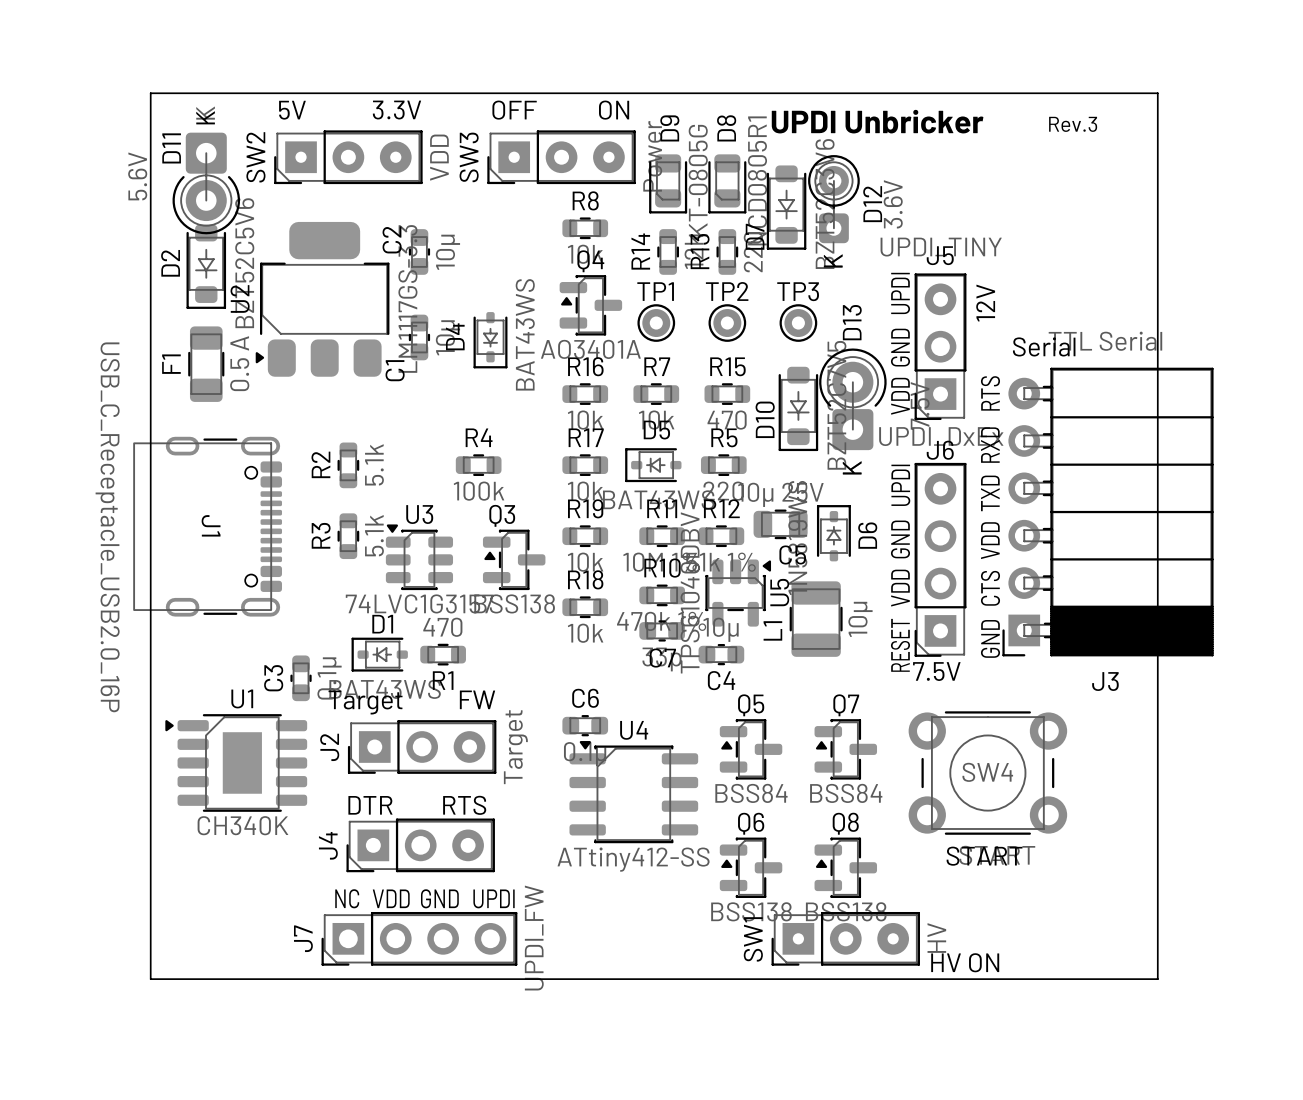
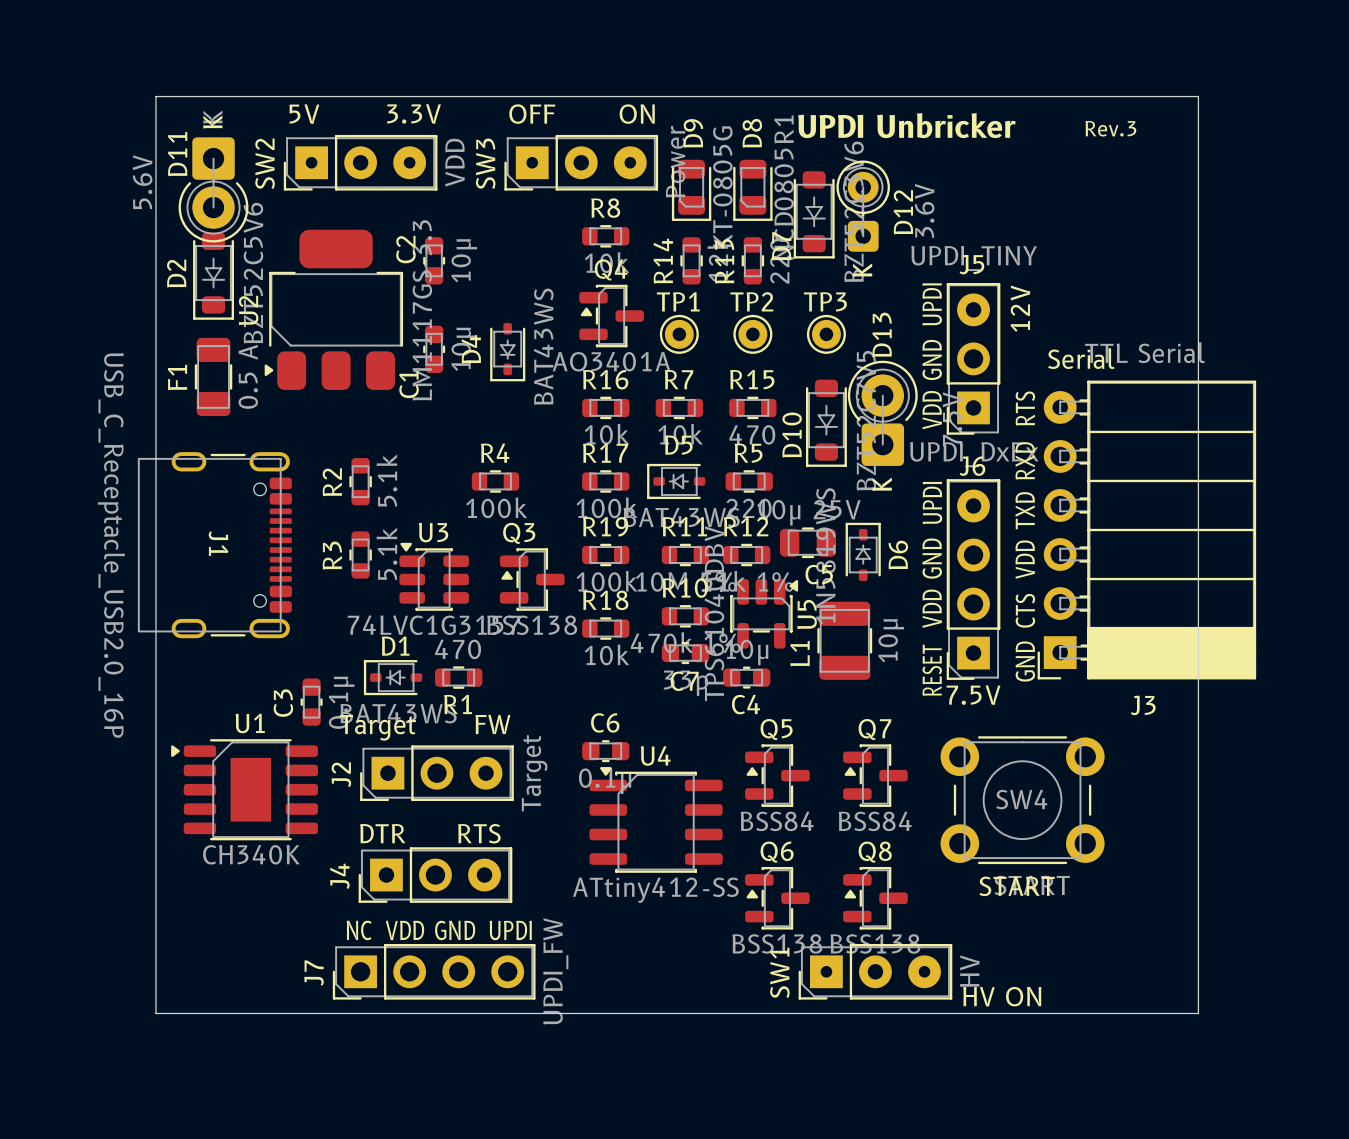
R17 value: 10k (585, 491) -> 100k (607, 507)
R19 value: 10k (585, 562) -> 100k (607, 581)

